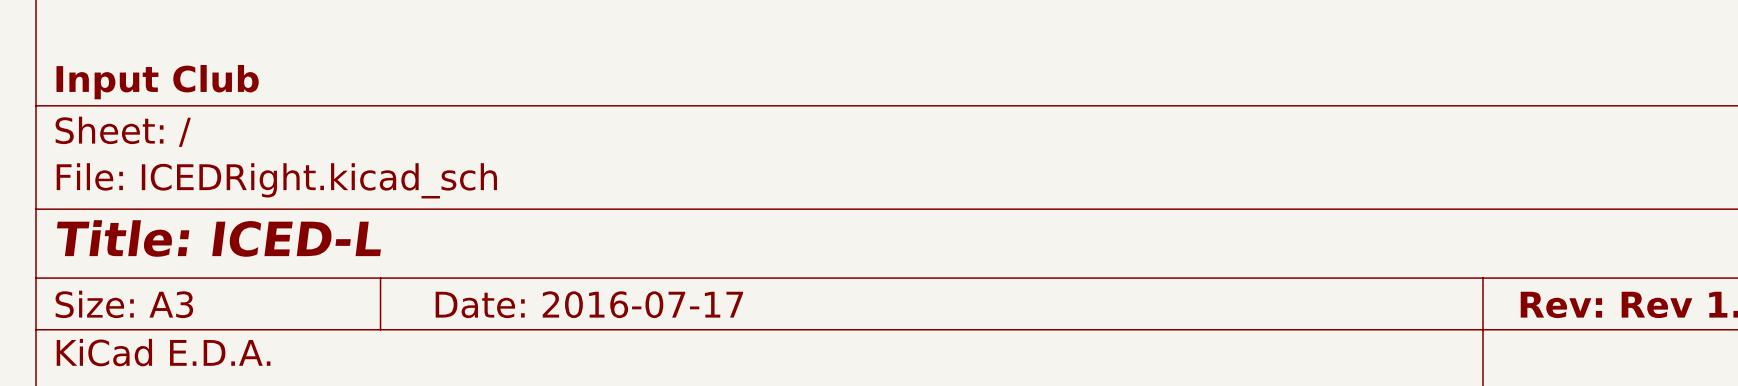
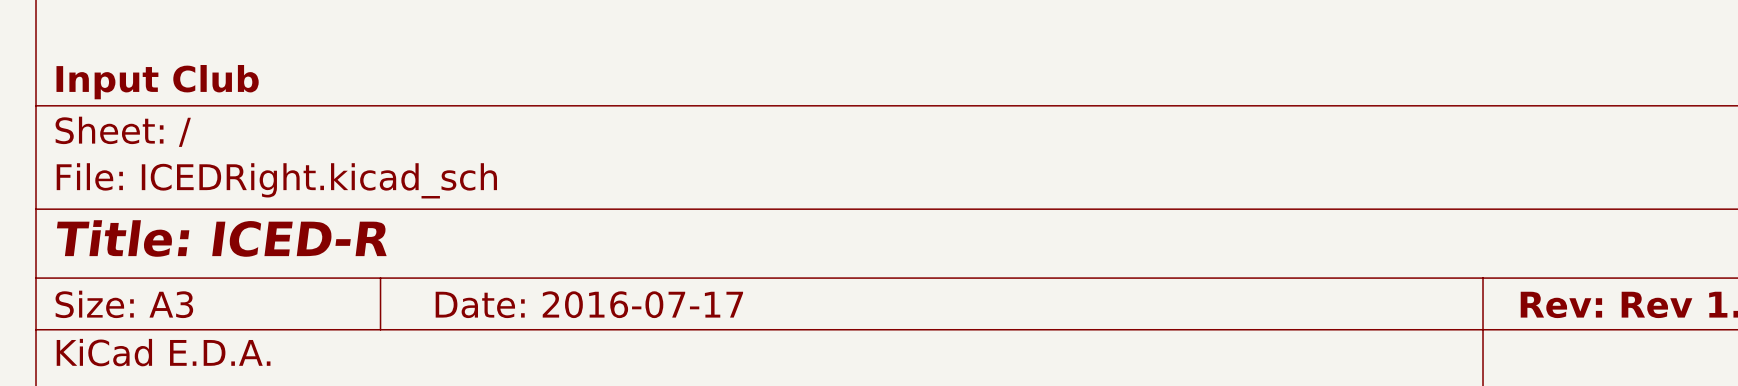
title block: Title: ICED-L (218, 238) -> Title: ICED-R (221, 238)

